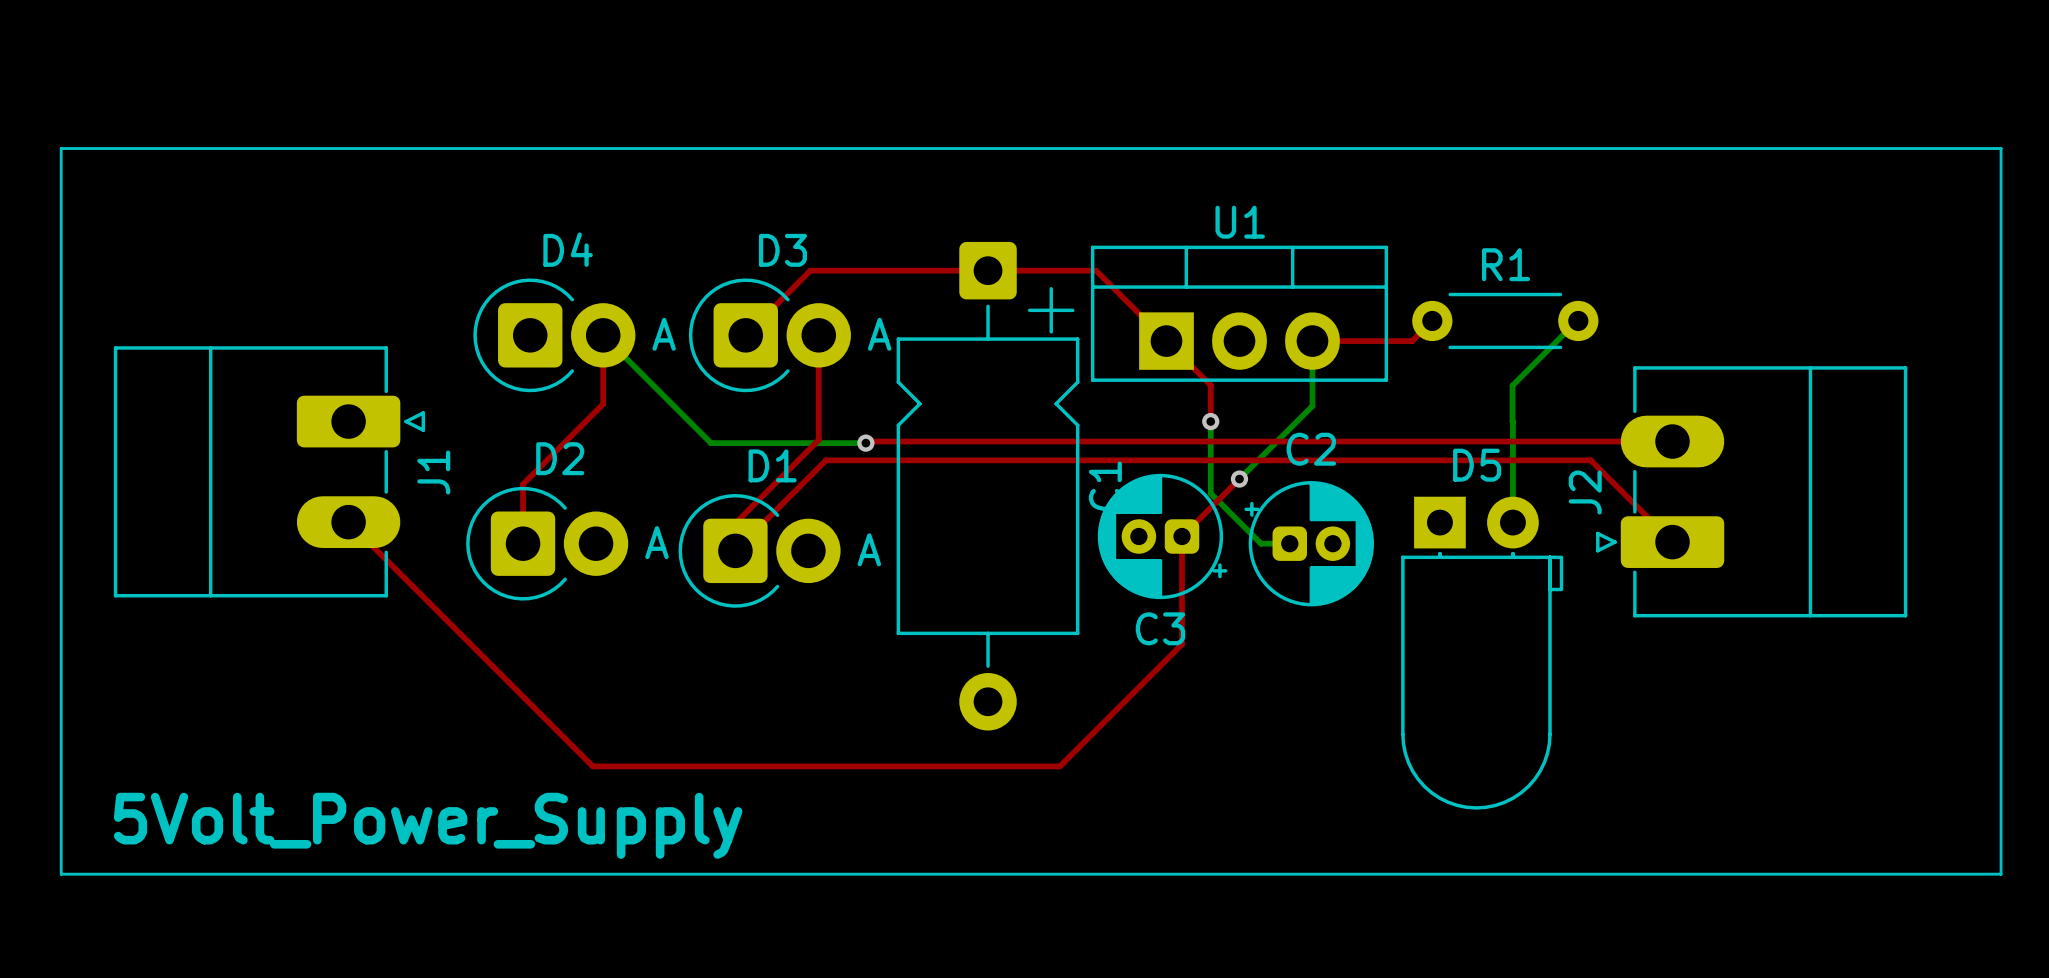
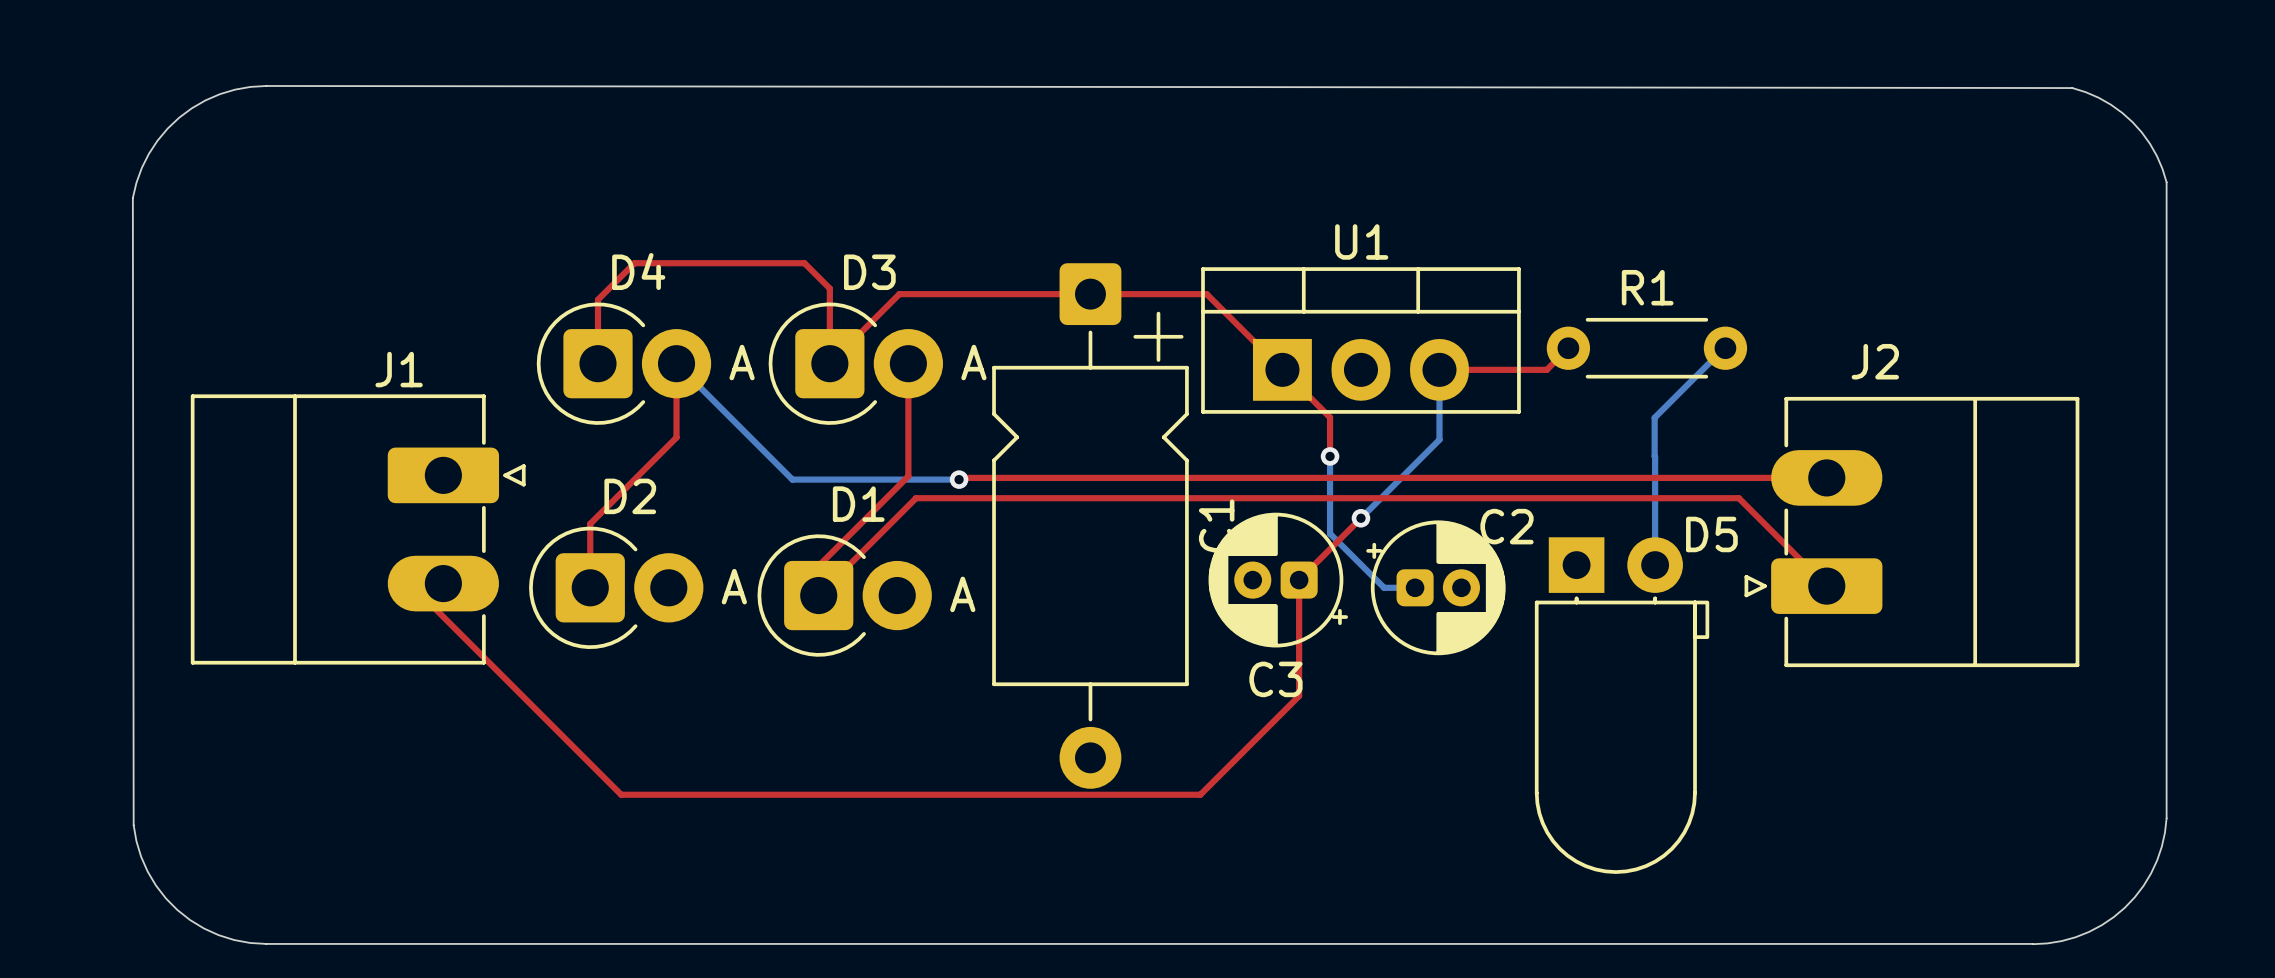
line: (61, 148) (2001, 148) (2001, 874) (61, 874) (61, 148) -> none
top track: none -> (598, 363) (598, 299) (634, 263) (804, 263) (829, 288) (829, 363)
C2 name position: C2 (1311, 449) -> C2 (1507, 526)
D5 name position: D5 (1477, 465) -> D5 (1711, 534)
J1 position: (269, 471) -> (358, 529)
J1 name rotation: 0° (433, 472) -> 90° clockwise (399, 369)
J1 name position: J1 (433, 472) -> J1 (399, 369)
J2 name rotation: 0° (1585, 492) -> 90° clockwise (1875, 361)
J2 name position: J2 (1585, 492) -> J2 (1875, 361)
top track: (348, 522) (592, 766) (1059, 766) (1090, 736) -> (402, 564) (402, 576) (621, 794) (1200, 794)
text: 5Volt_Power_Supply (428, 825) -> none
board edge: none -> (2033, 943) (266, 943) (234, 940) (218, 935) (190, 920) (165, 898) (155, 885) (141, 856) (133, 825) (132, 197) (141, 167) (148, 153) (167, 128) (191, 108) (219, 94) (235, 89) (266, 85) (2072, 88) (2085, 92) (2110, 104) (2132, 122) (2141, 132) (2156, 156) (2166, 182) (2166, 818) (2161, 846) (2157, 860) (2143, 885) (2124, 907) (2101, 925) (2089, 931) (2061, 941) (2033, 944)

